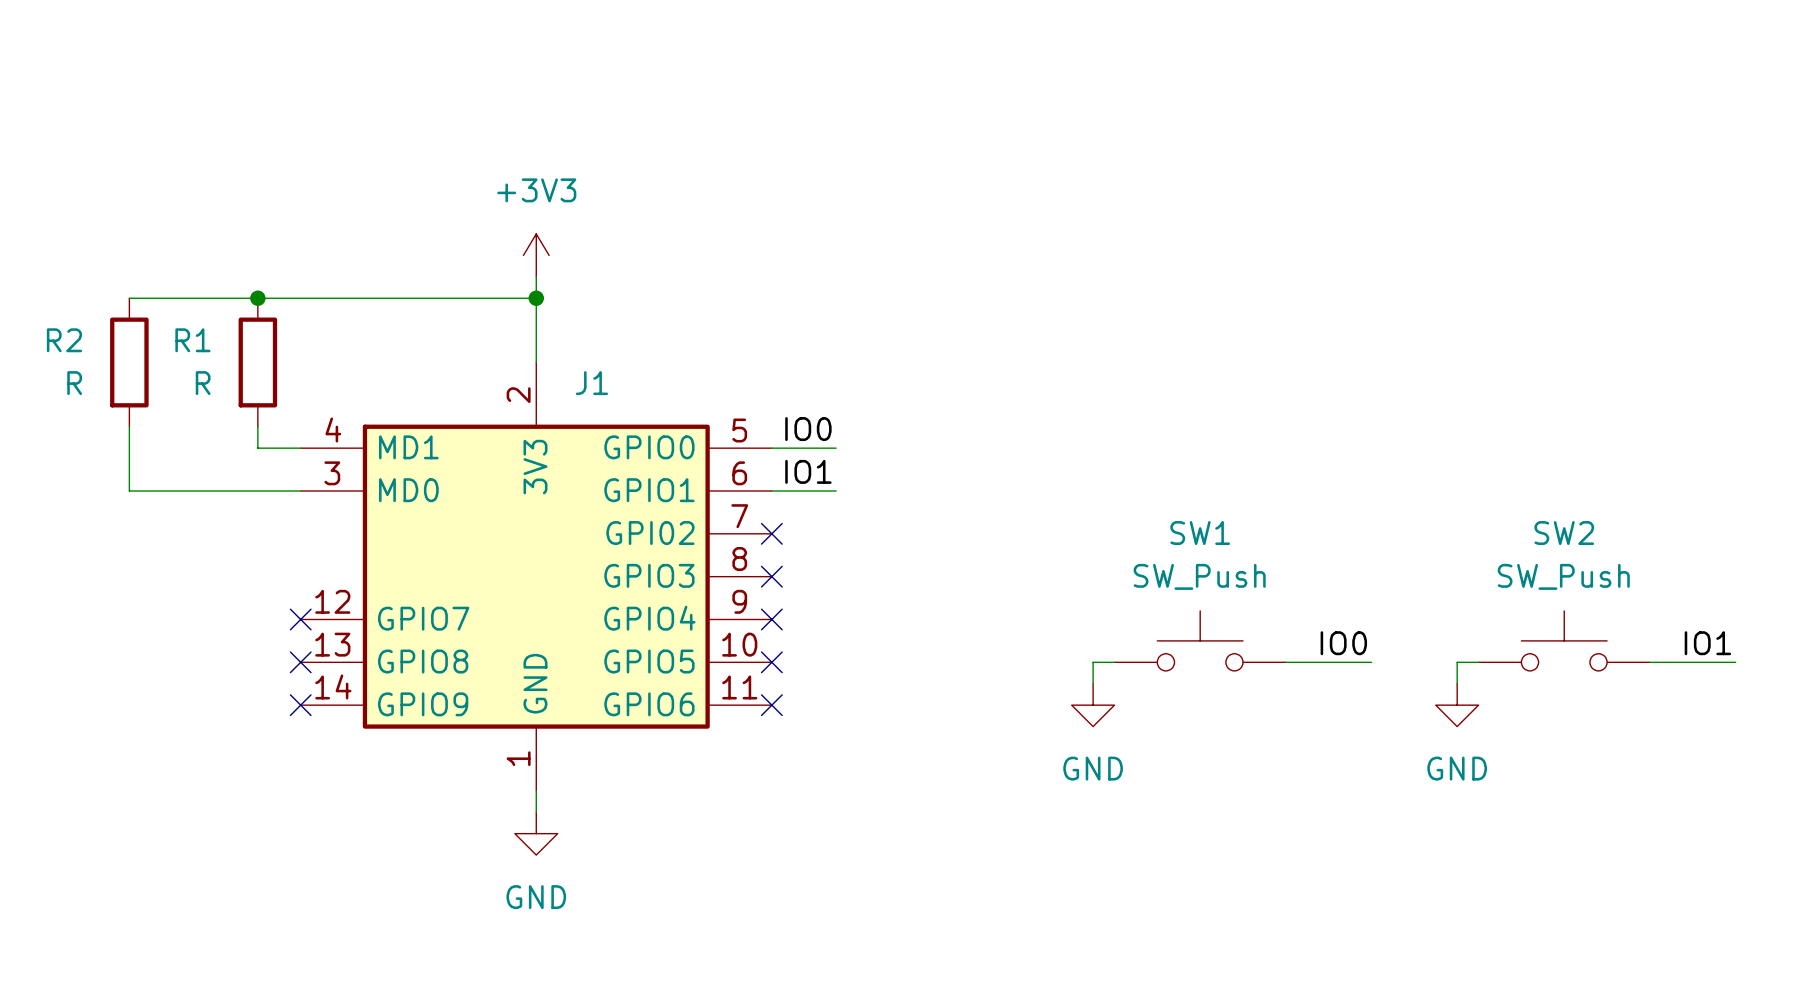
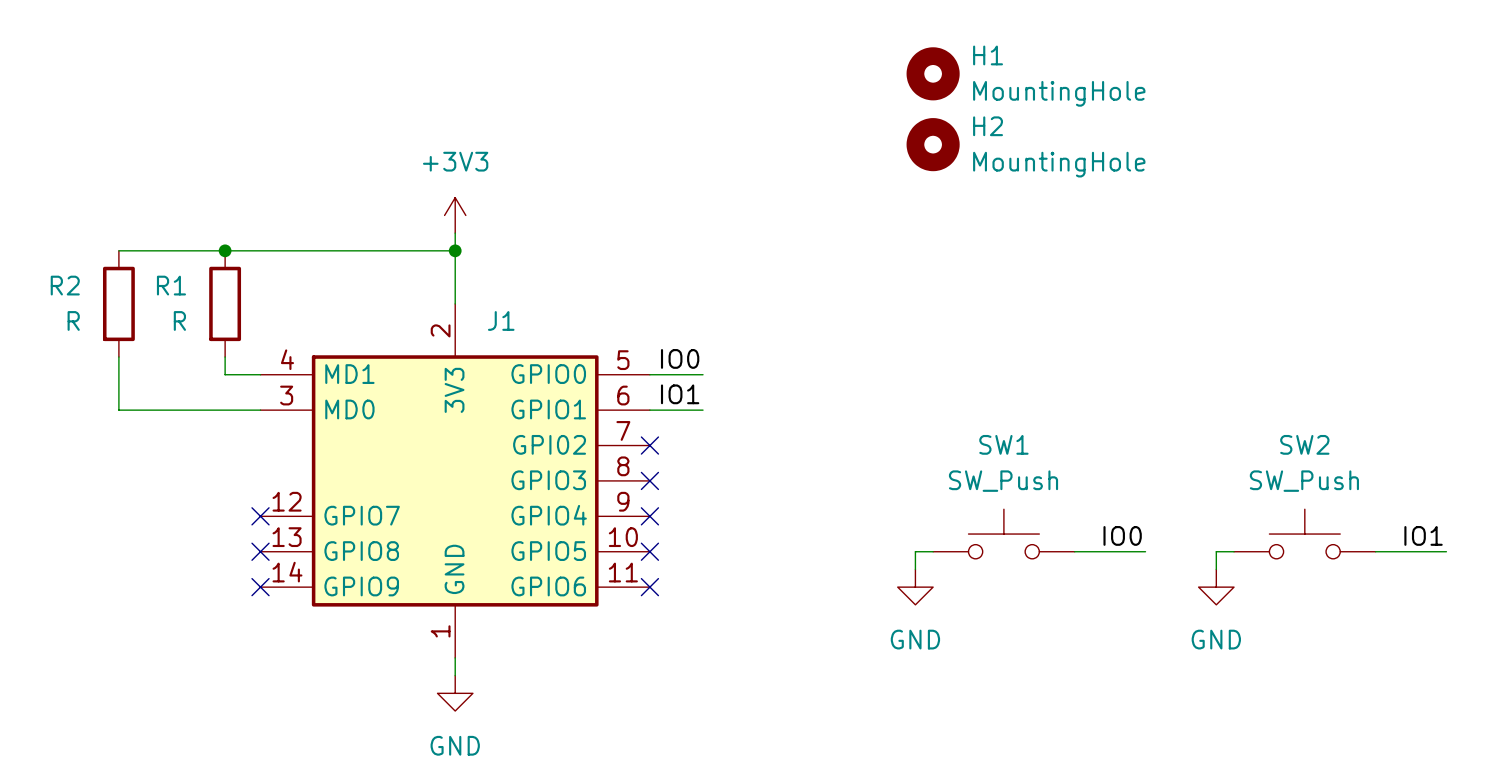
H1: none -> MountingHole (933, 73)
H2: none -> MountingHole (933, 144)

